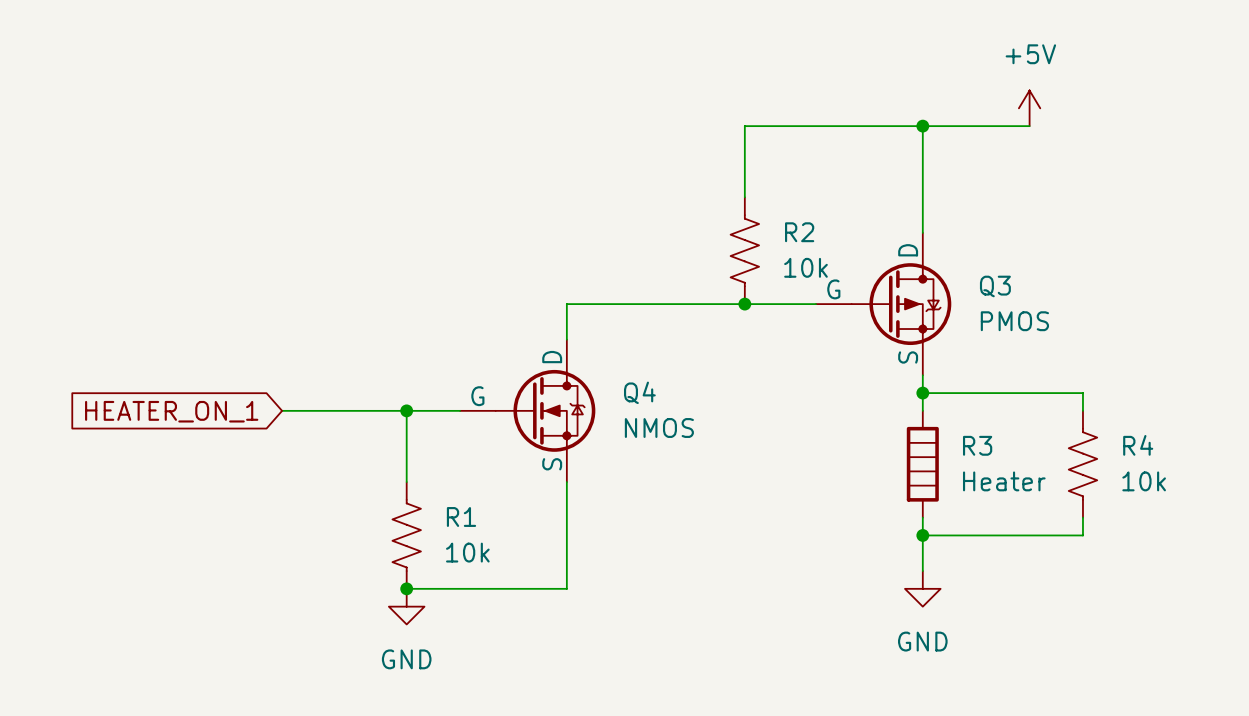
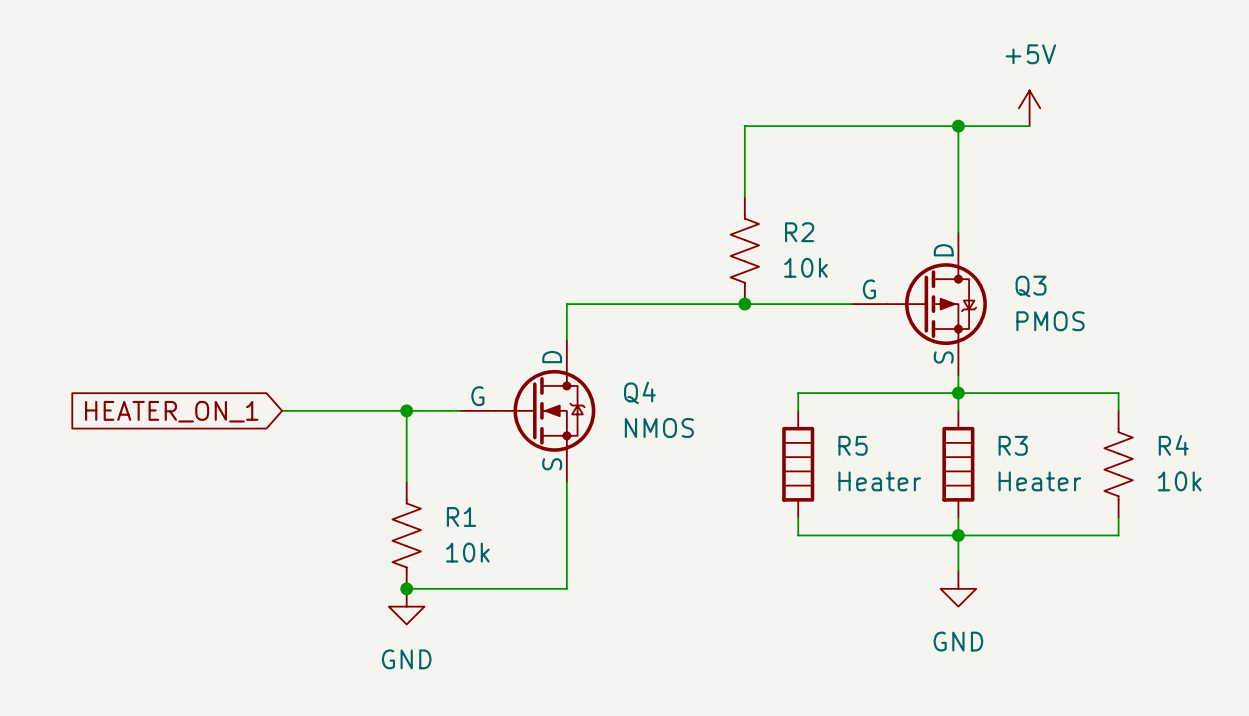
wire: (922, 126) (922, 232) -> (958, 126) (958, 232)
junction position: (922, 126) -> (958, 126)
Q3 position: (883, 304) -> (919, 304)
wire: (922, 375) (922, 410) -> (958, 375) (958, 410)
wire: none -> (922, 393) (798, 393) (798, 410)
junction position: (922, 393) -> (958, 393)
wire: (1082, 393) (1082, 410) -> (1082, 393) (1118, 393) (1118, 410)
R5: none -> Heater (798, 464)
R3 position: (922, 464) -> (958, 464)
R4 position: (1082, 464) -> (1118, 464)
wire: none -> (798, 517) (798, 535) (922, 535)
wire: (922, 517) (922, 571) -> (958, 517) (958, 571)
wire: (1082, 517) (1082, 535) -> (1118, 517) (1118, 535) (1082, 535)
junction position: (922, 535) -> (958, 535)
power symbol position: GND (922, 588) -> GND (958, 588)

